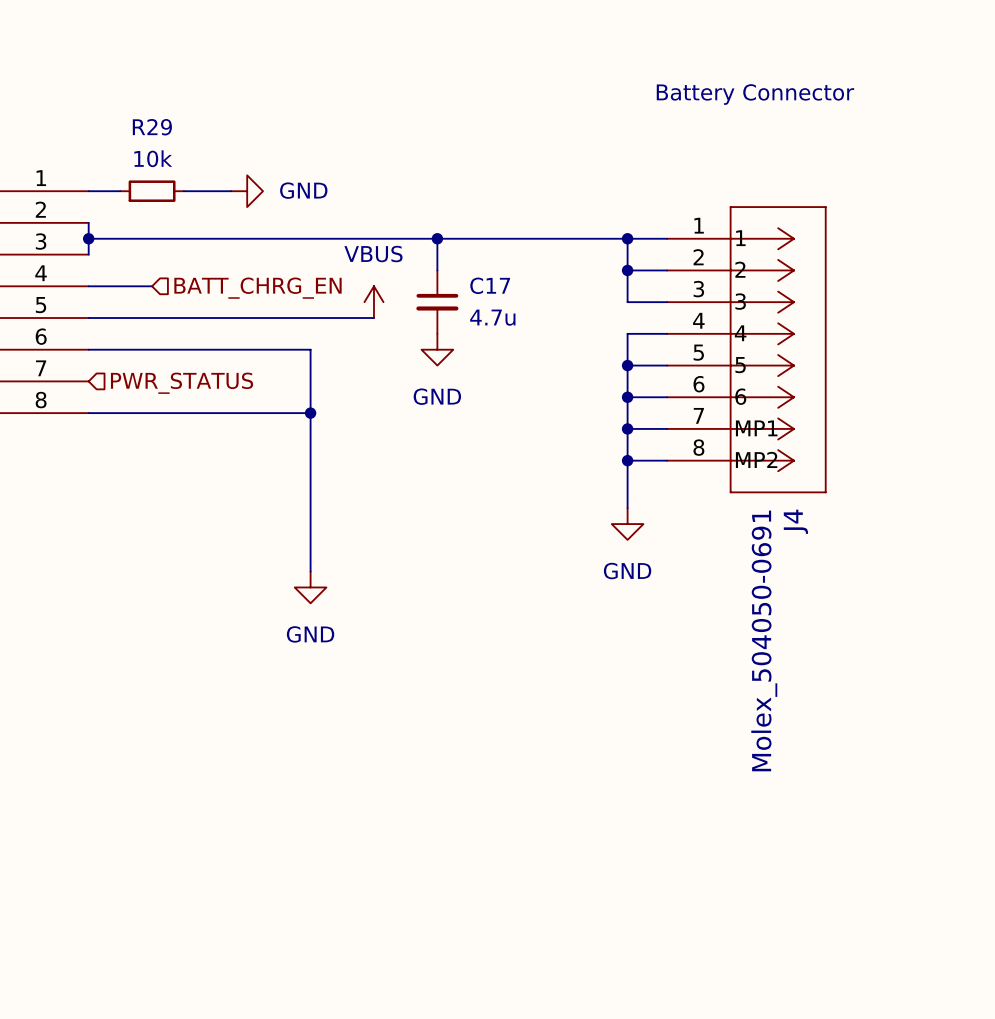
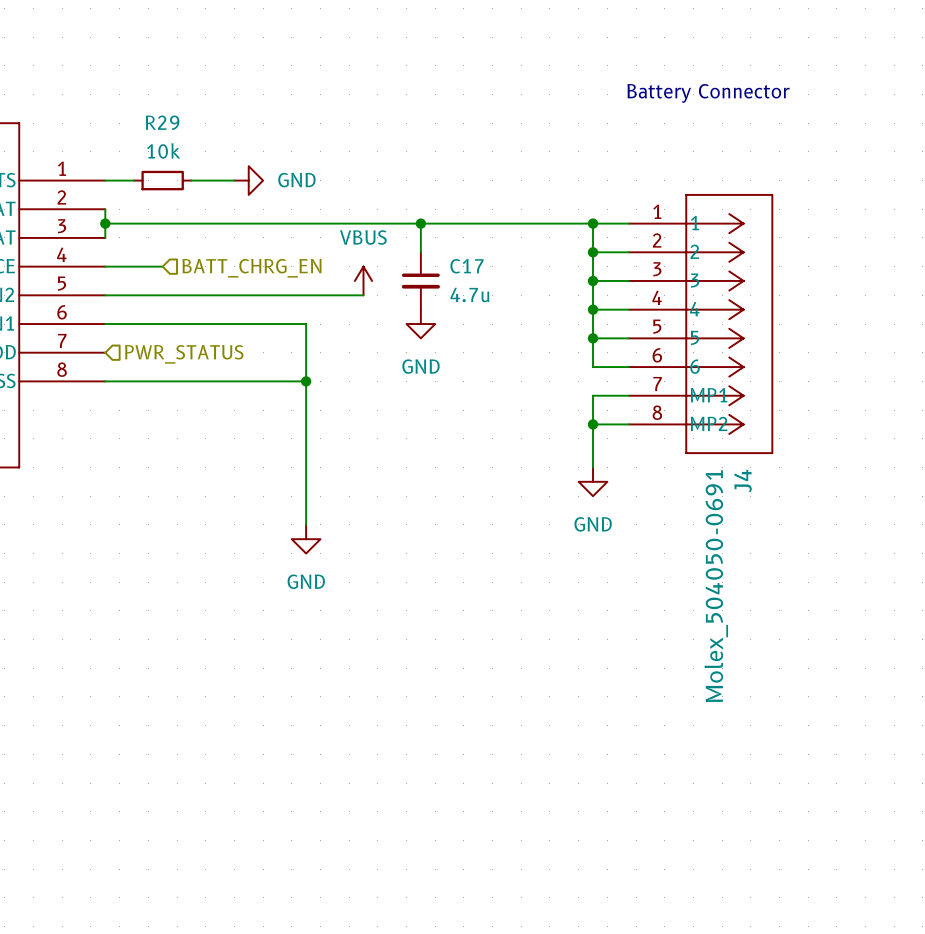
junction: none -> (593, 280)
junction: none -> (593, 309)
wire: (627, 397) (627, 428) -> (593, 280) (593, 309)
junction: (627, 397) -> none
junction: (627, 428) -> none

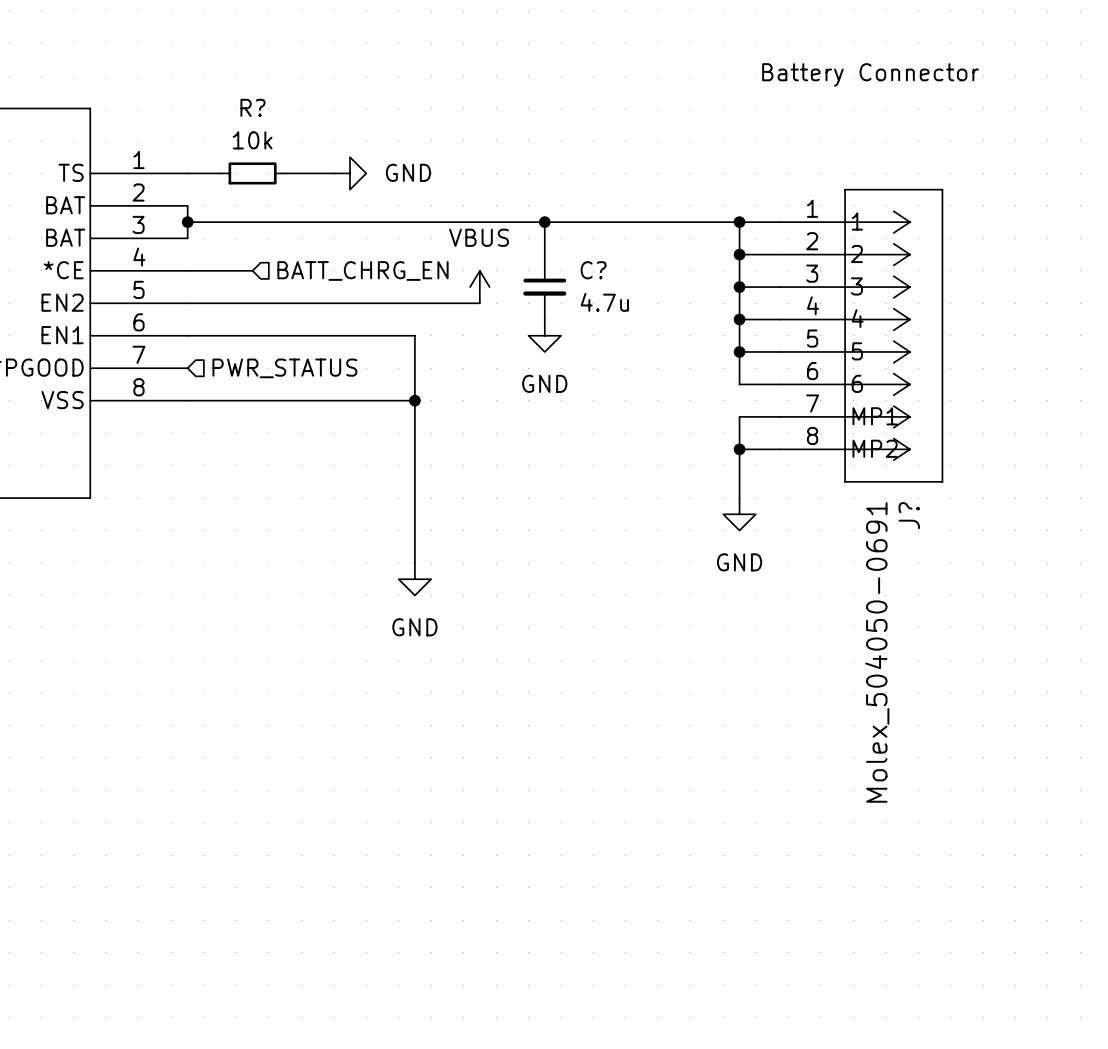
R29 name: R29 (162, 122) -> R? (252, 107)
C17 name: C17 (466, 266) -> C? (593, 270)
J4 name: J4 (743, 481) -> J? (909, 515)

